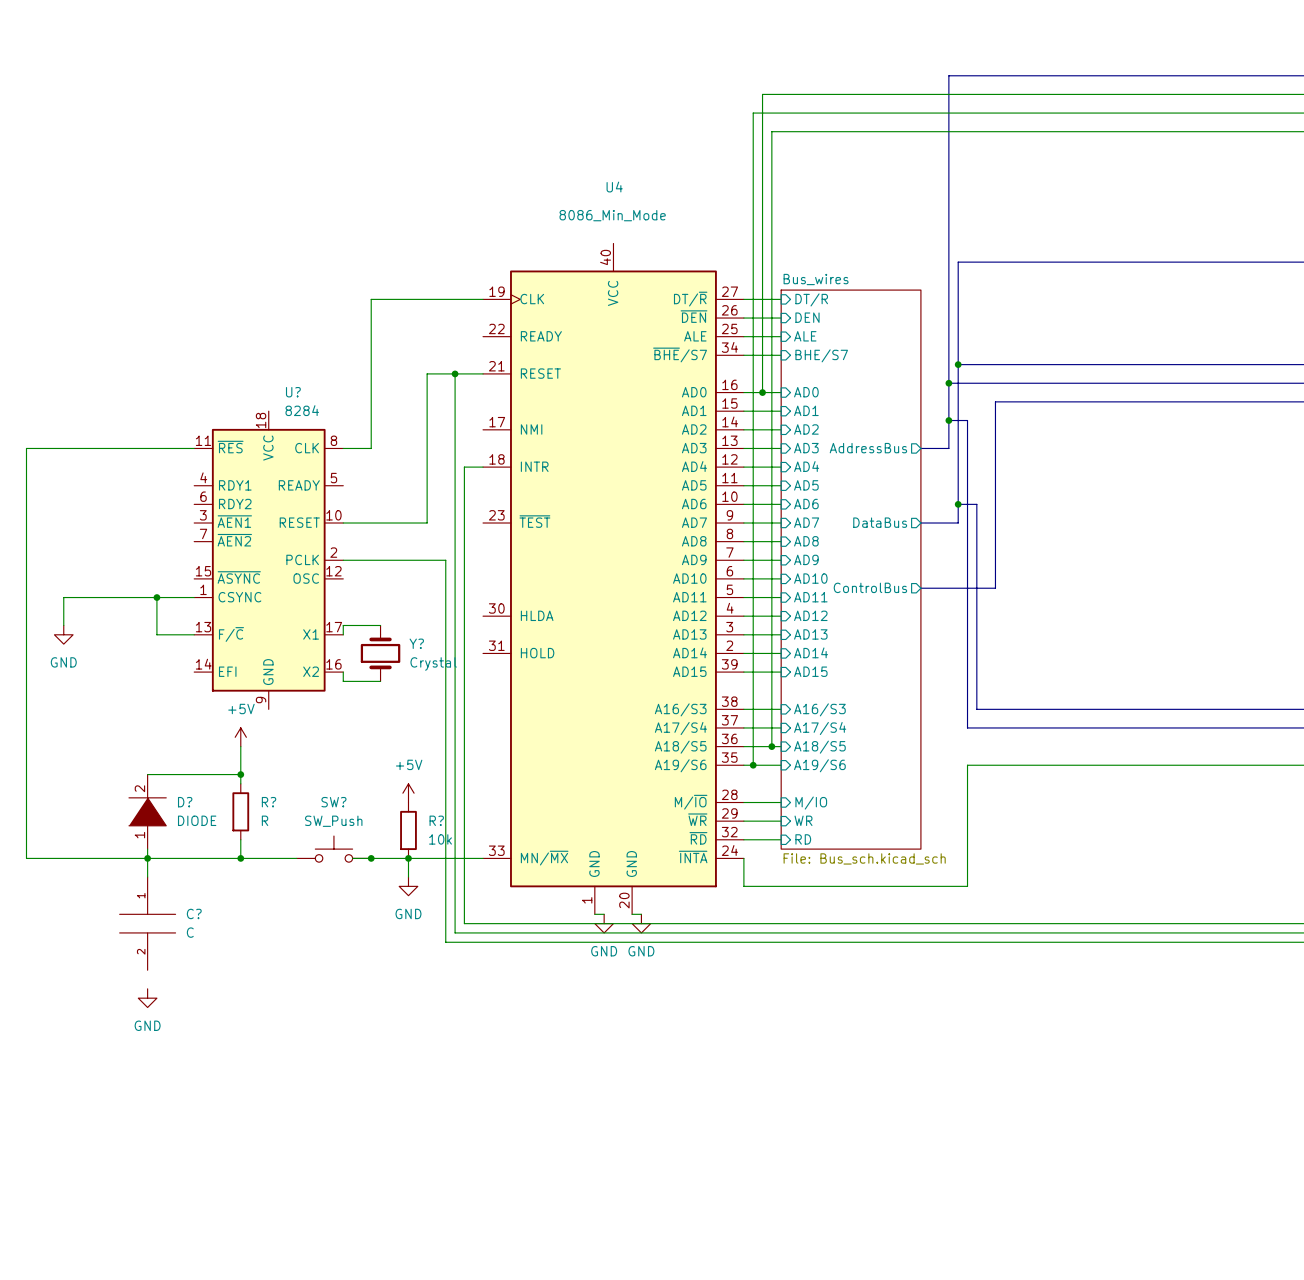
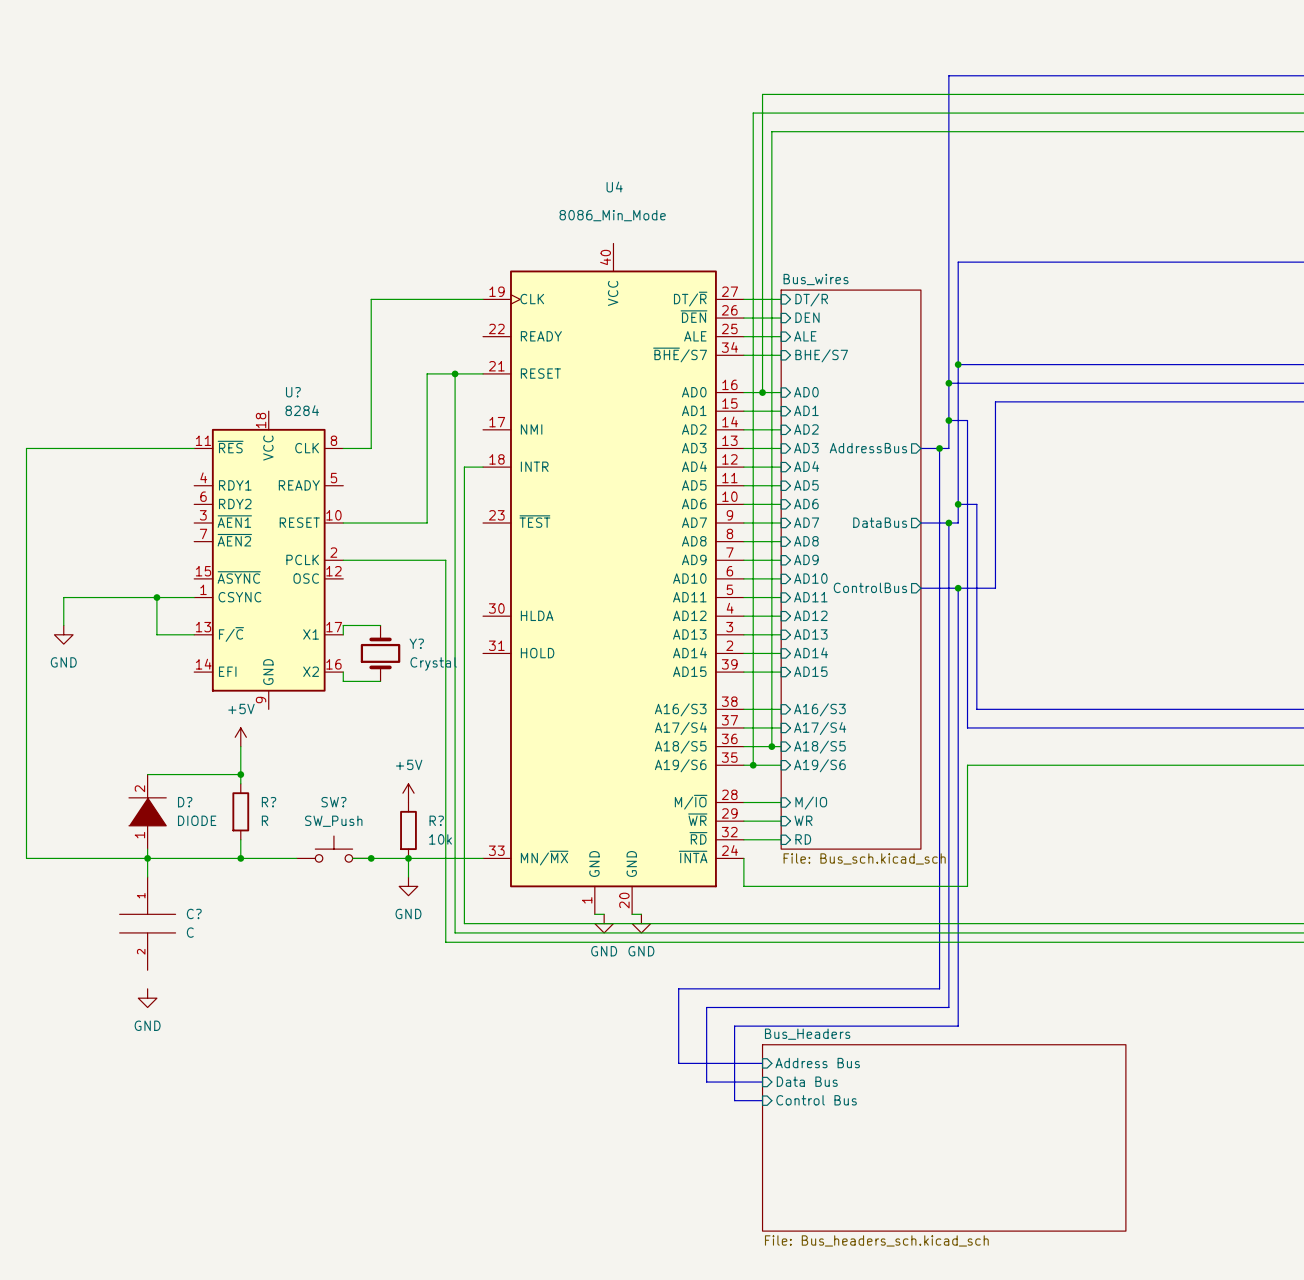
bus: none -> (939, 448) (939, 988) (678, 988) (678, 1063) (762, 1063)
junction: none -> (939, 448)
bus: none -> (948, 523) (948, 1007) (706, 1007) (706, 1082) (762, 1082)
junction: none -> (948, 523)
bus: none -> (958, 588) (958, 1026) (734, 1026) (734, 1100) (762, 1100)
junction: none -> (958, 588)
sheet pin: none -> Address Bus (817, 1063)
sheet pin: none -> Data Bus (807, 1081)
sheet pin: none -> Control Bus (816, 1100)
sheet Bus_Headers: none -> File: Bus_headers_sch.kicad_sch (944, 1137)

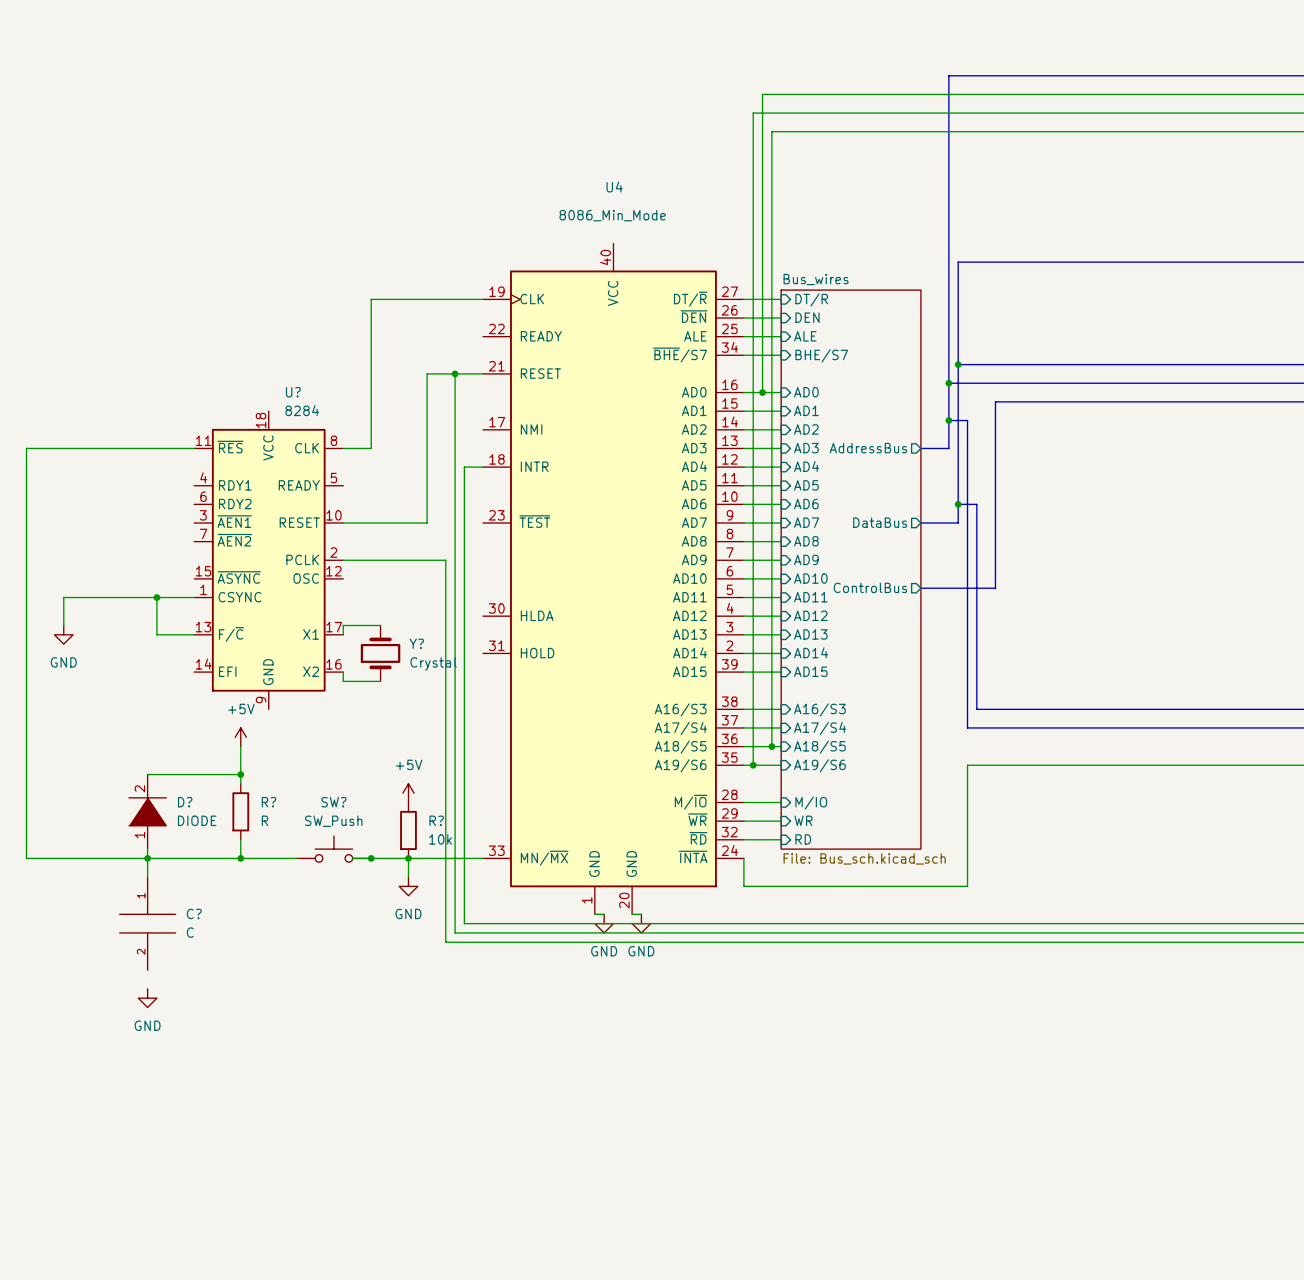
bus: (939, 448) (939, 988) (678, 988) (678, 1063) (762, 1063) -> none
junction: (939, 448) -> none
bus: (948, 523) (948, 1007) (706, 1007) (706, 1082) (762, 1082) -> none
junction: (948, 523) -> none
bus: (958, 588) (958, 1026) (734, 1026) (734, 1100) (762, 1100) -> none
junction: (958, 588) -> none
sheet pin: Address Bus (817, 1063) -> none
sheet pin: Data Bus (807, 1081) -> none
sheet pin: Control Bus (816, 1100) -> none
sheet Bus_Headers: File: Bus_headers_sch.kicad_sch (944, 1137) -> none

